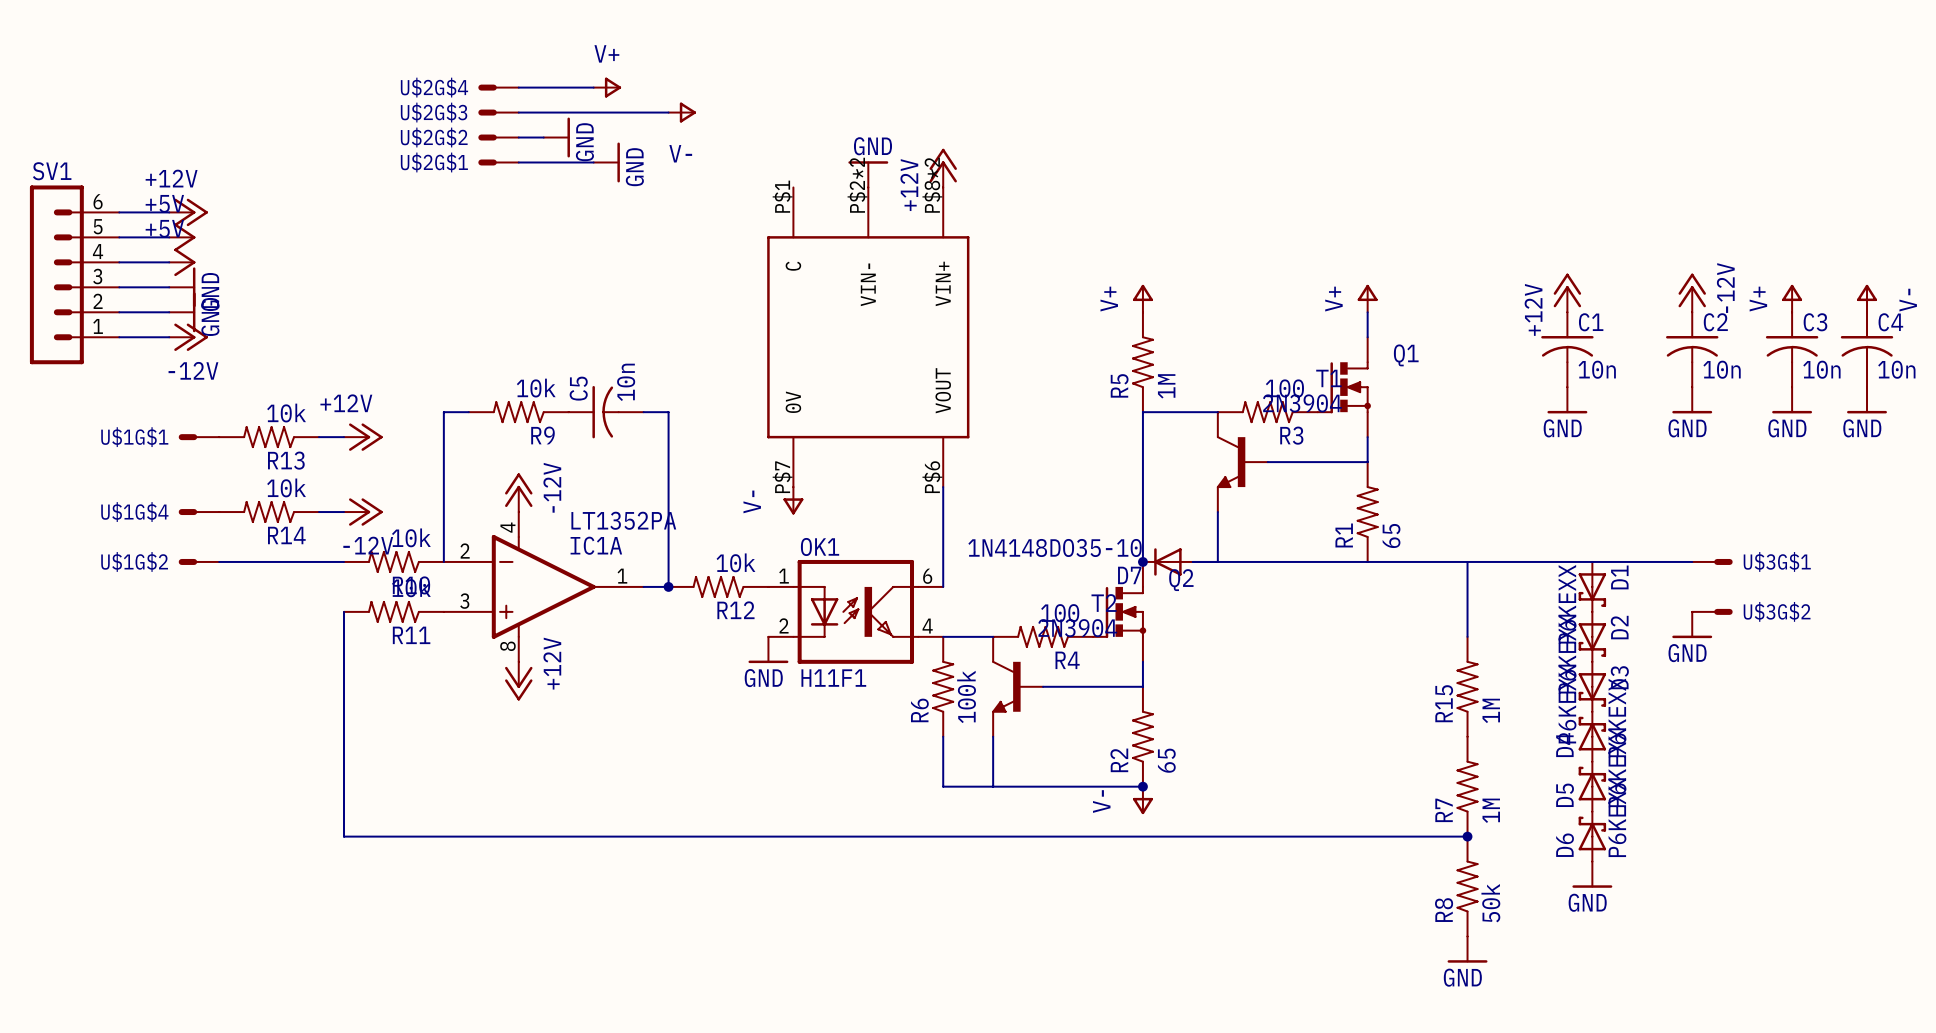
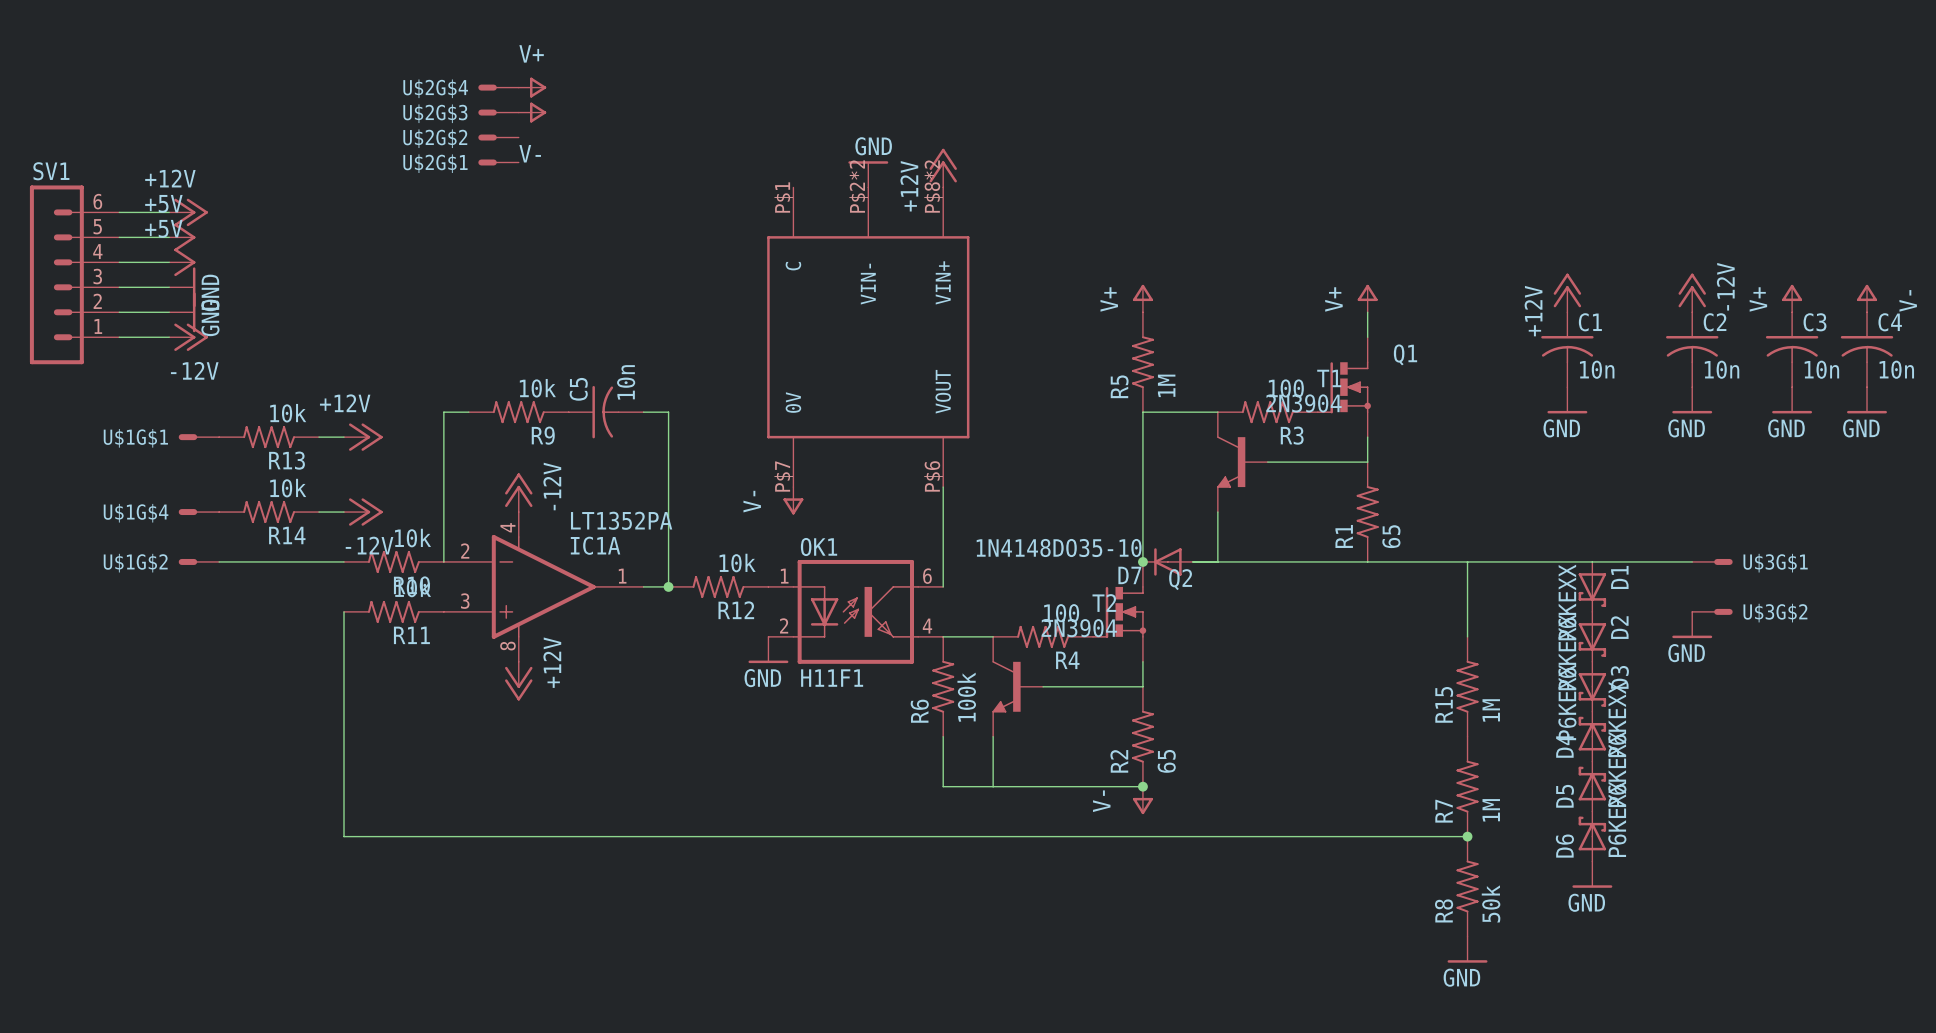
wire: (518, 87) (593, 87) -> none
power symbol position: V+ (607, 87) -> V+ (532, 87)
wire: (518, 112) (668, 112) -> none
power symbol position: V- (682, 112) -> V- (532, 112)
wire: (518, 137) (543, 137) -> none
power symbol: GND (556, 137) -> none
wire: (518, 162) (593, 162) -> none
power symbol: GND (606, 162) -> none

